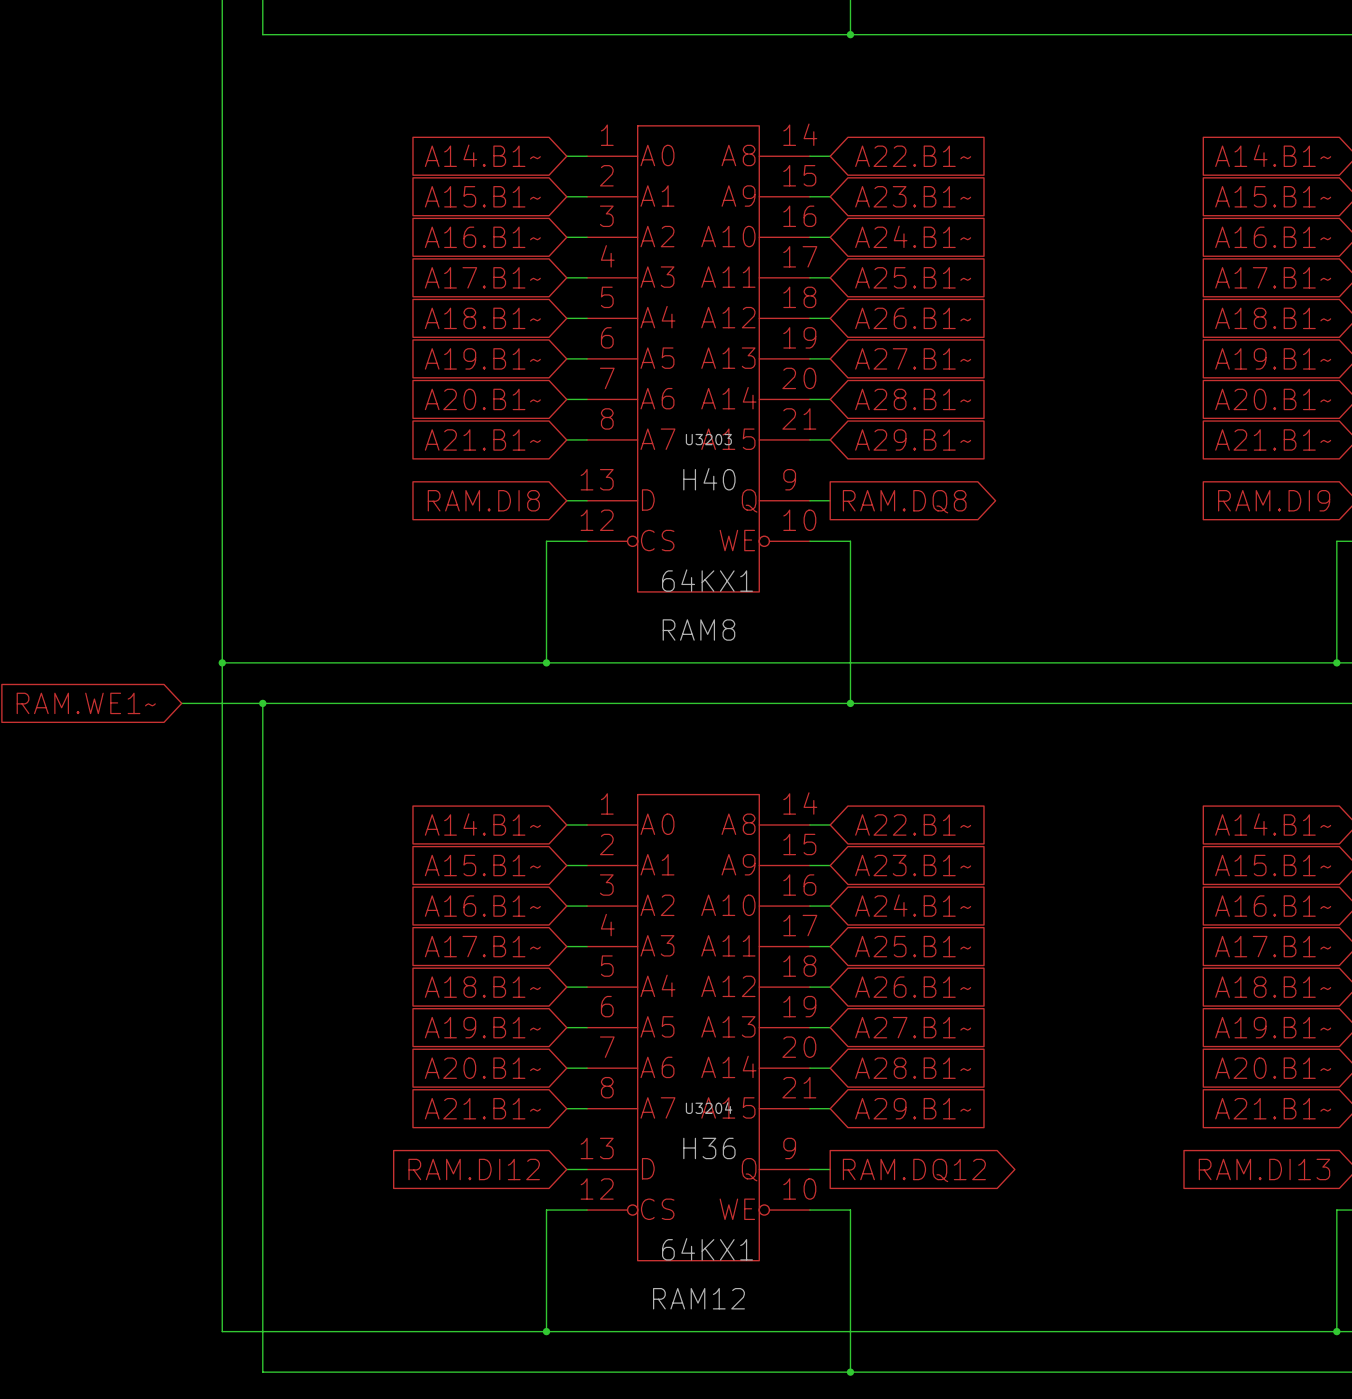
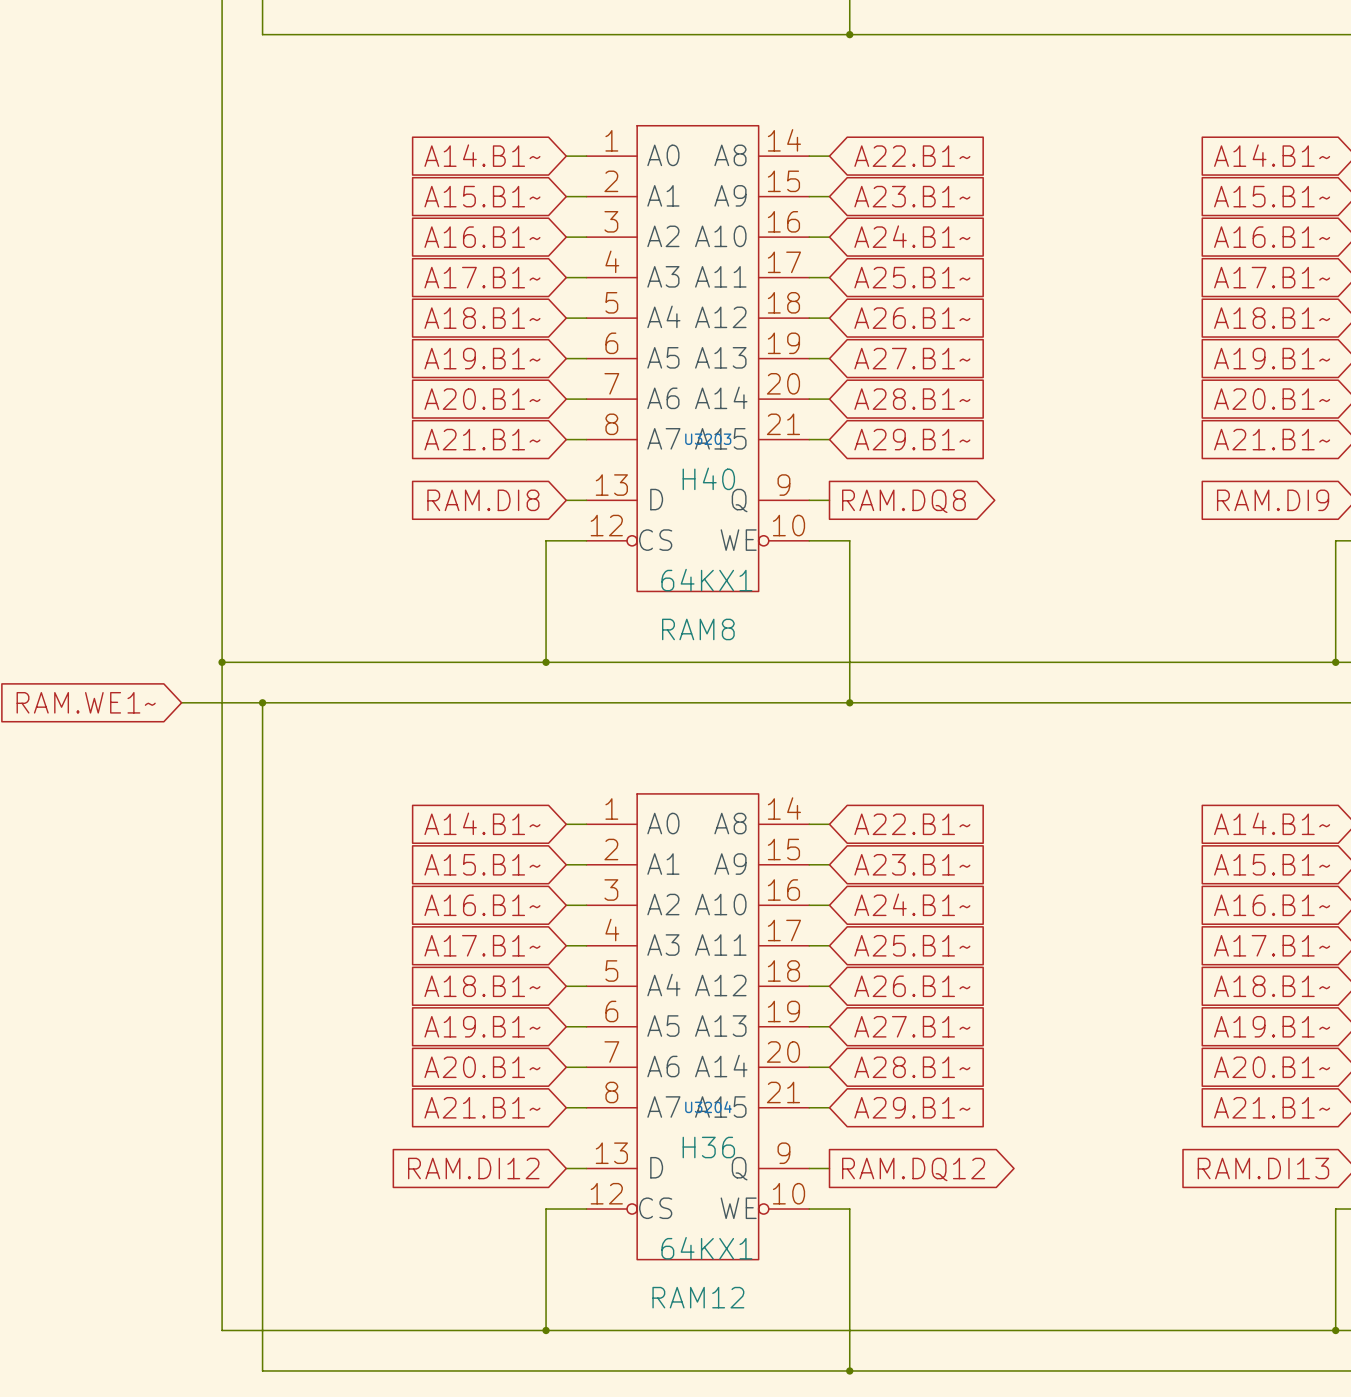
U3203 symbol: [587, 125, 810, 592] -> [586, 125, 810, 592]
U3204 symbol: [587, 794, 810, 1261] -> [586, 793, 810, 1260]

